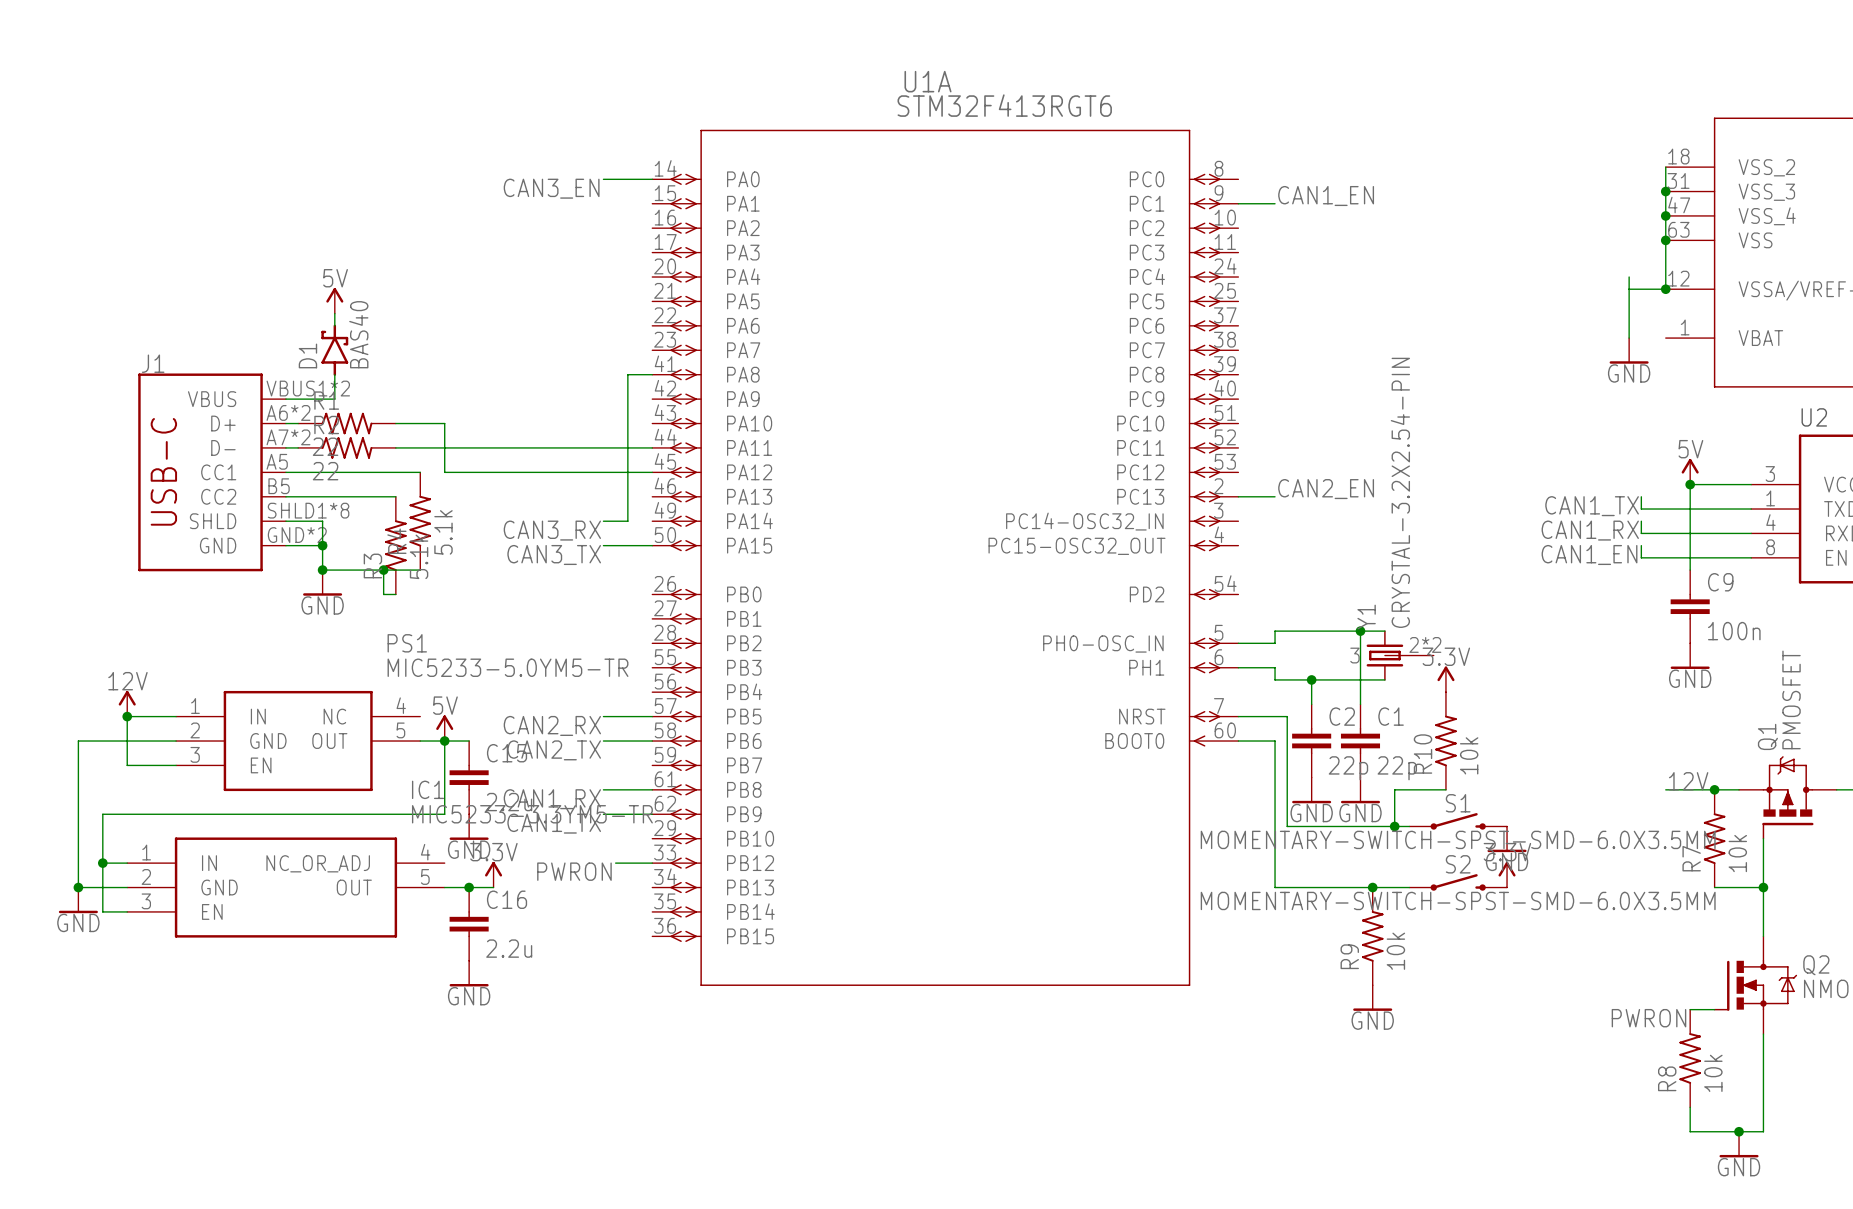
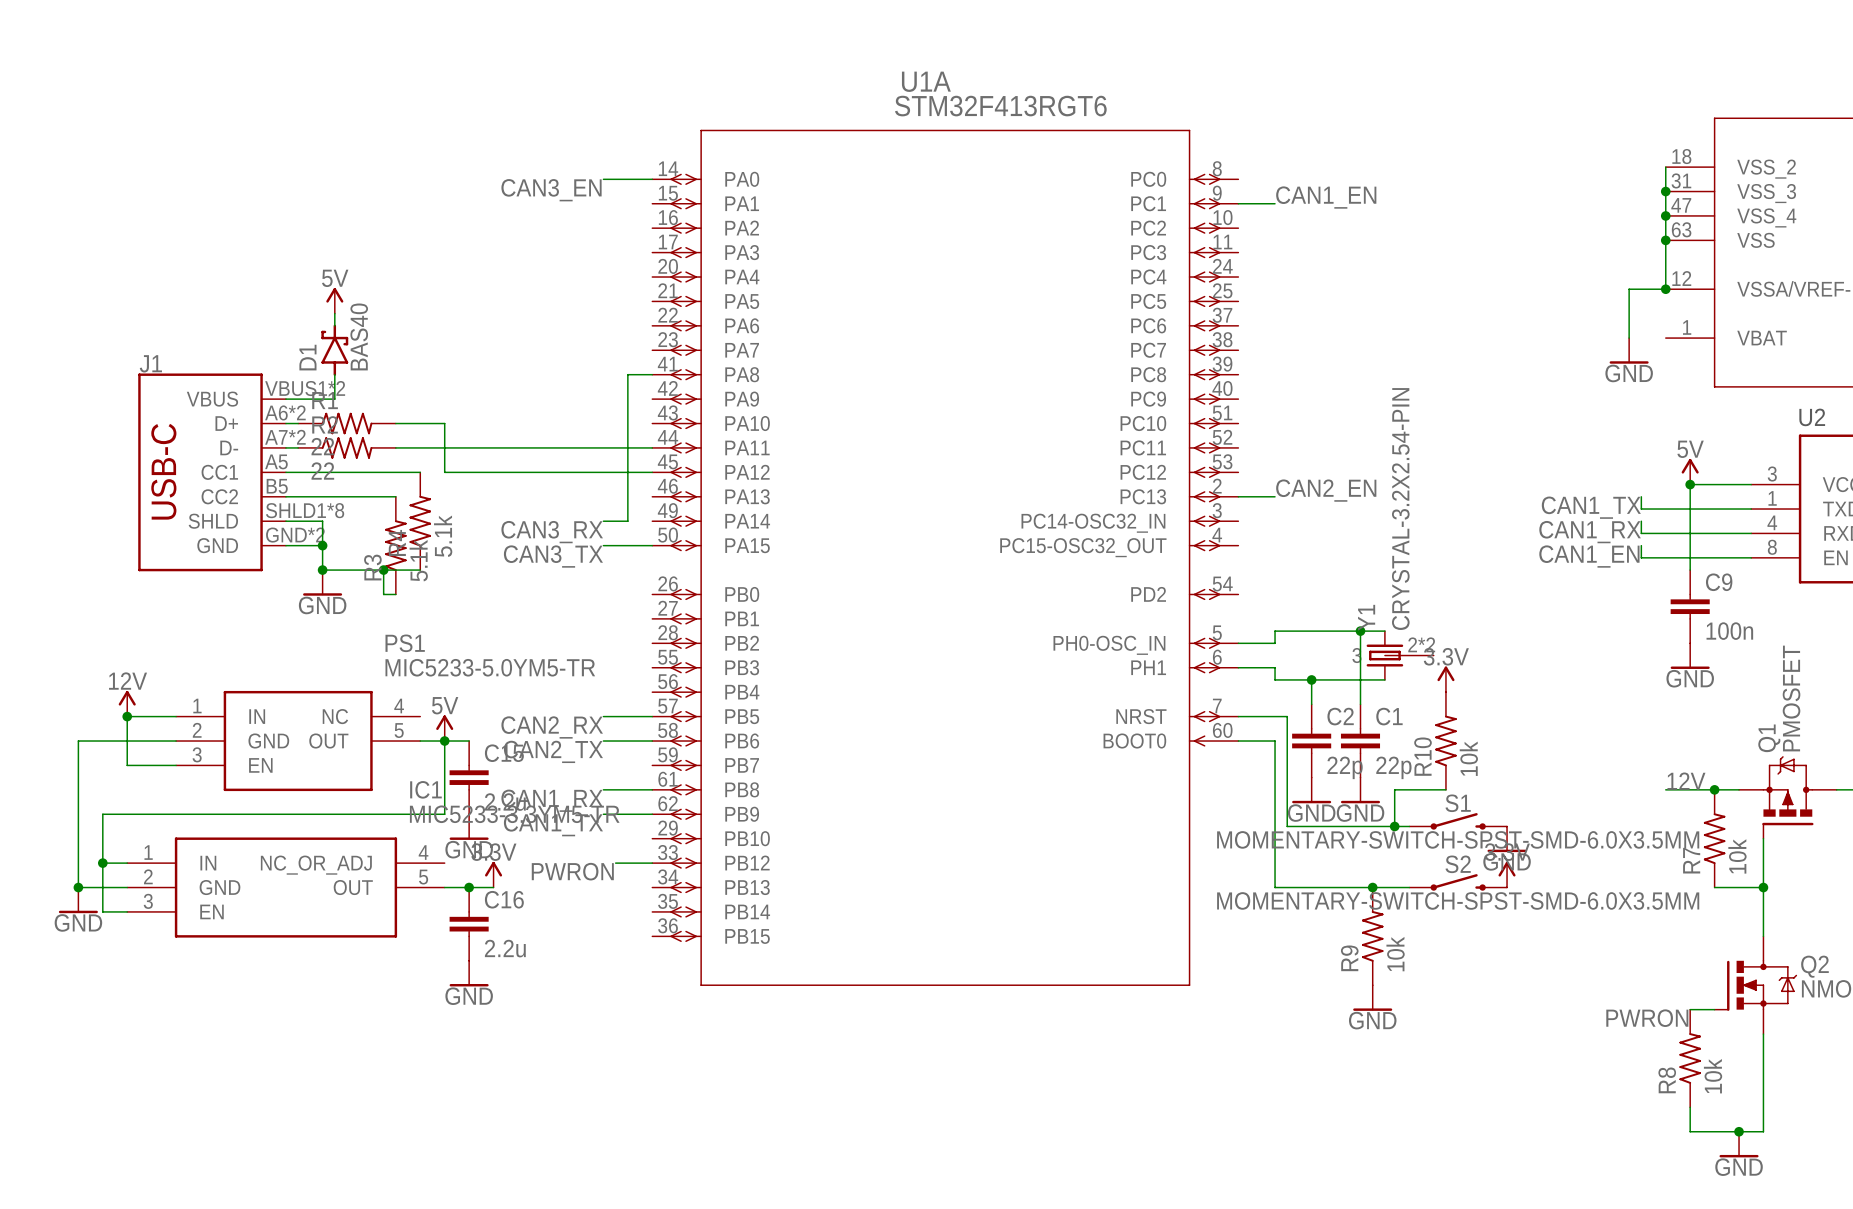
wire: (1629, 277) (1629, 289) -> none

